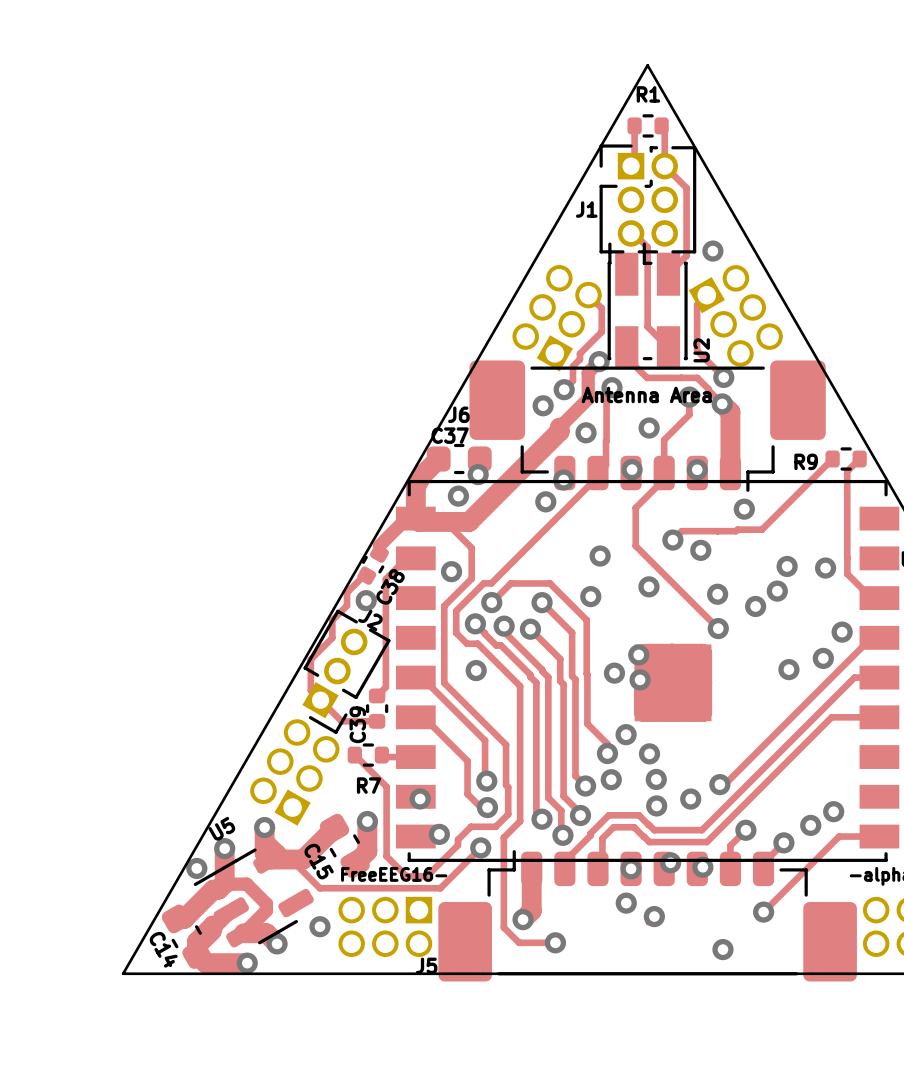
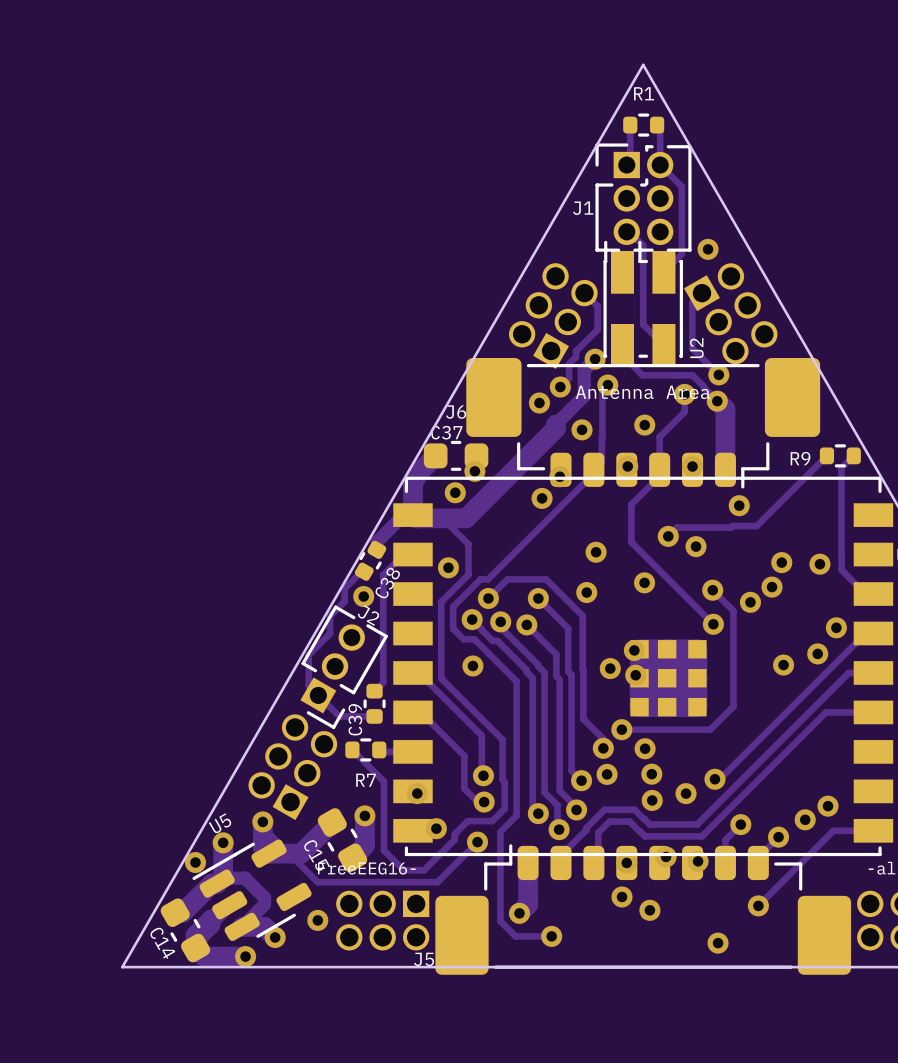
track: none -> (712, 590) (733, 610) (733, 706) (710, 729) (621, 729)

